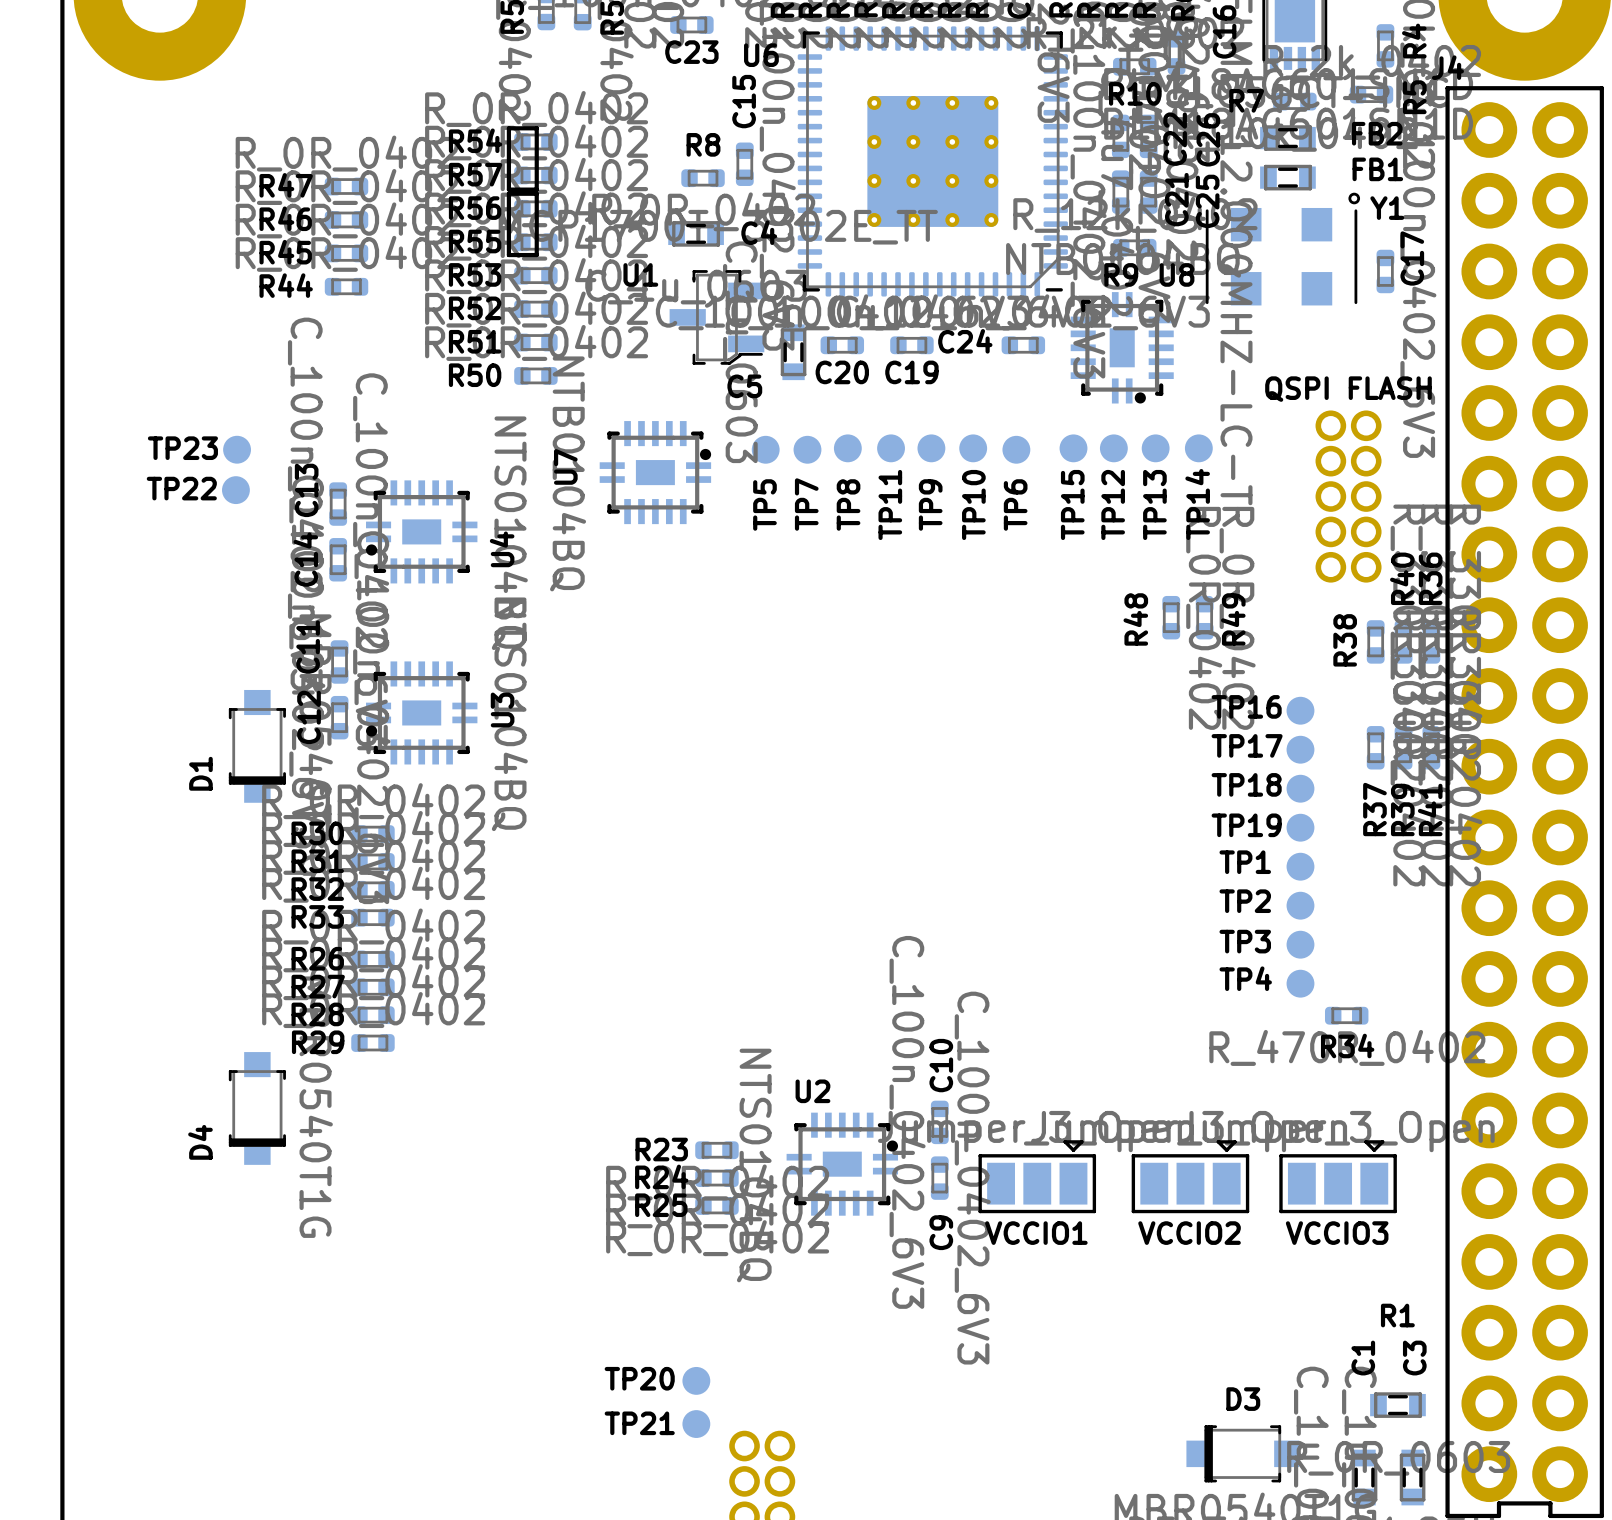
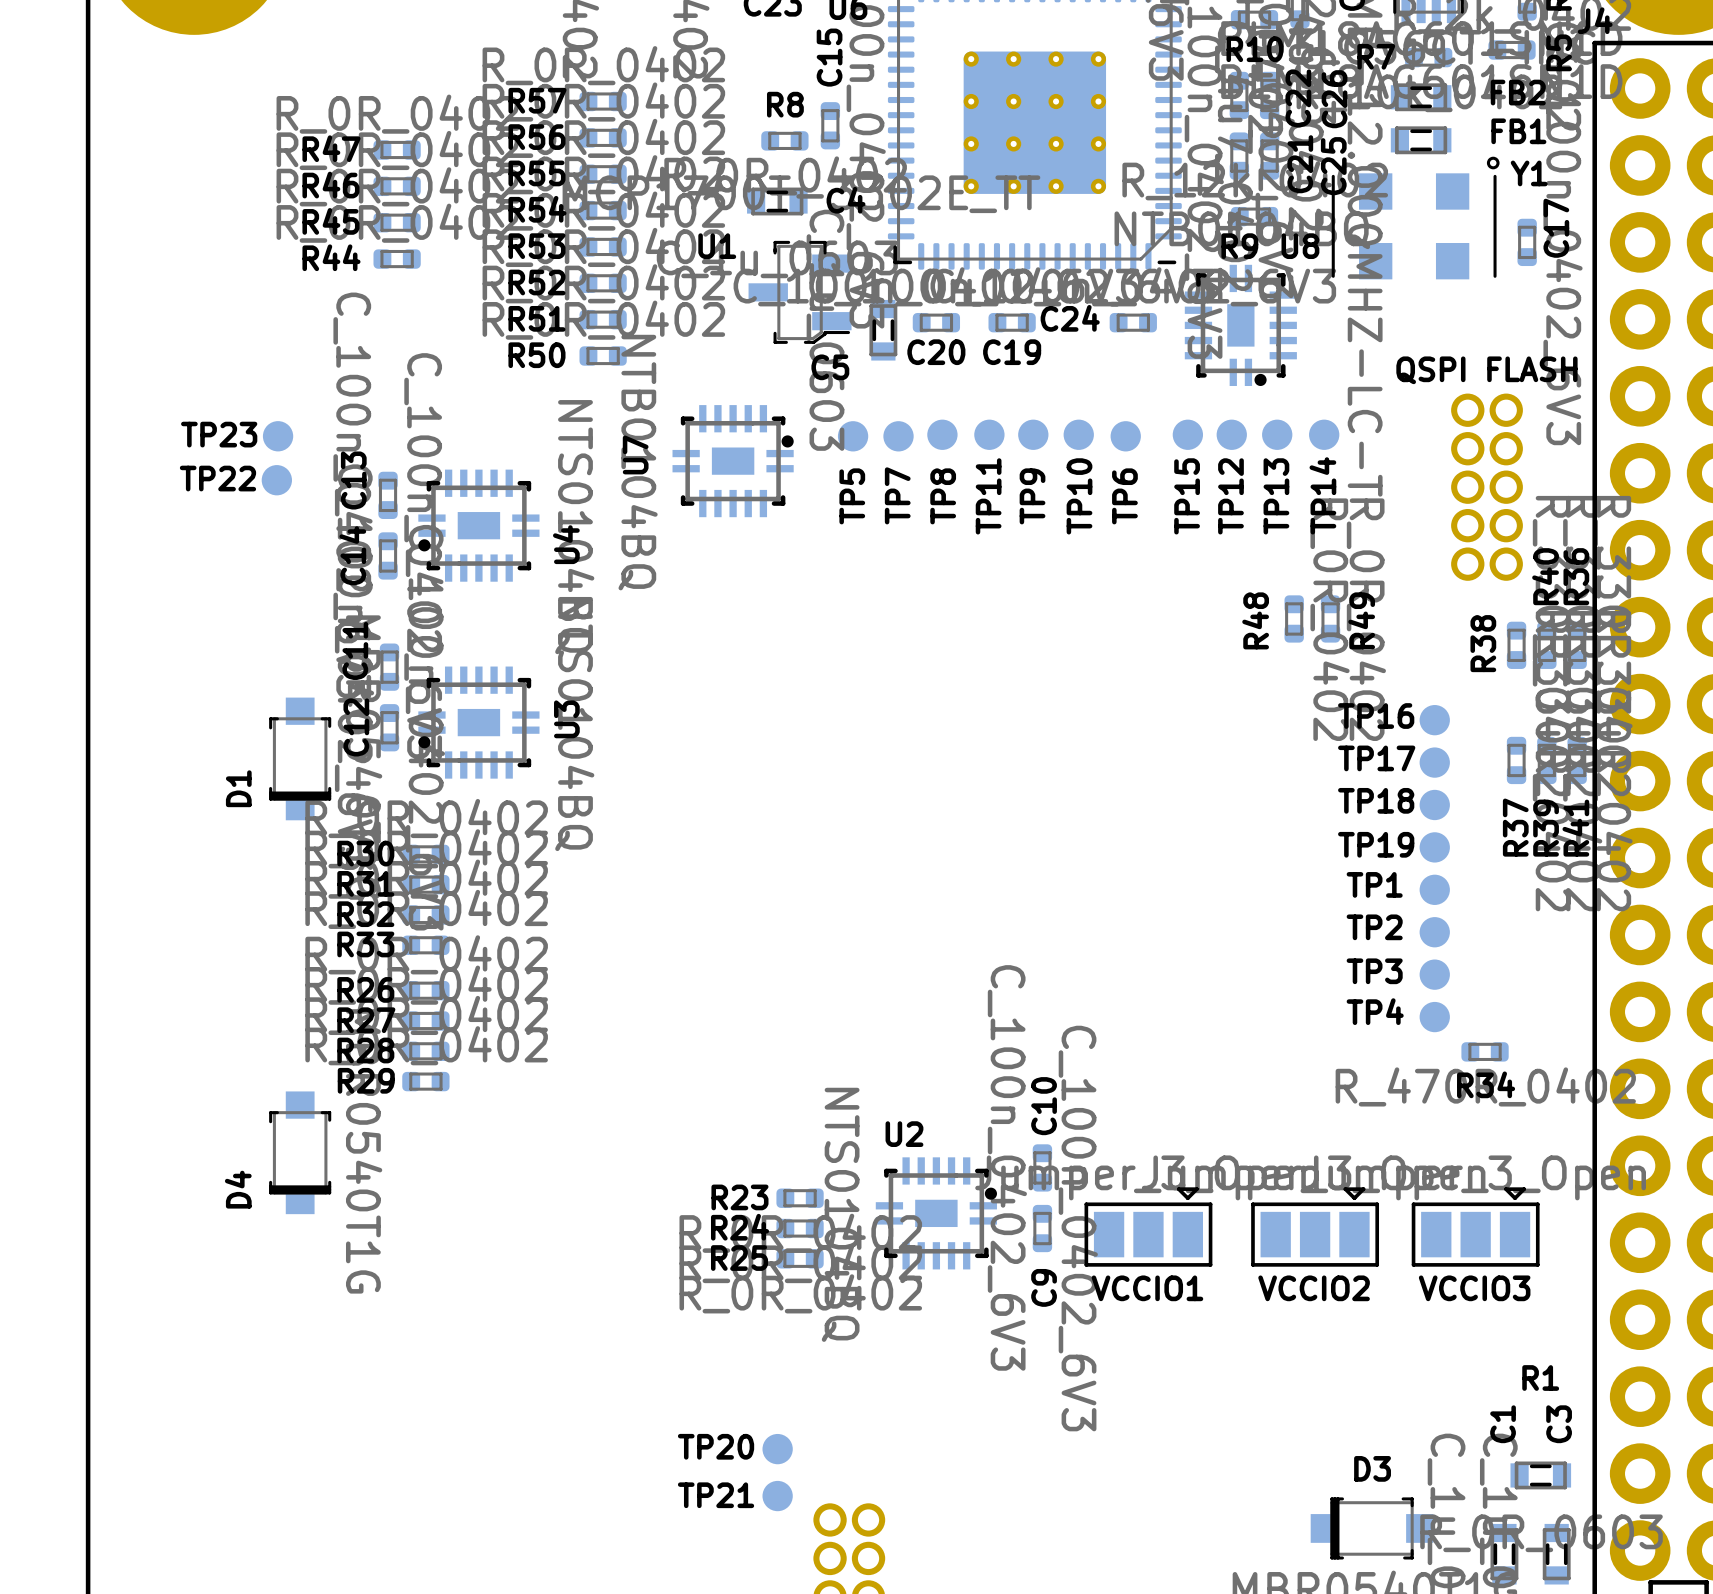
line: (536, 128) (536, 189) (508, 189) (508, 128) (536, 128) -> none
R54 name: R54 (475, 140) -> R57 (537, 100)
R57 name: R57 (475, 174) -> R56 (536, 137)
line: (536, 193) (508, 193) (508, 255) (536, 255) (536, 193) -> none
R56 name: R56 (475, 208) -> R55 (536, 173)
R55 name: R55 (475, 241) -> R54 (537, 209)

